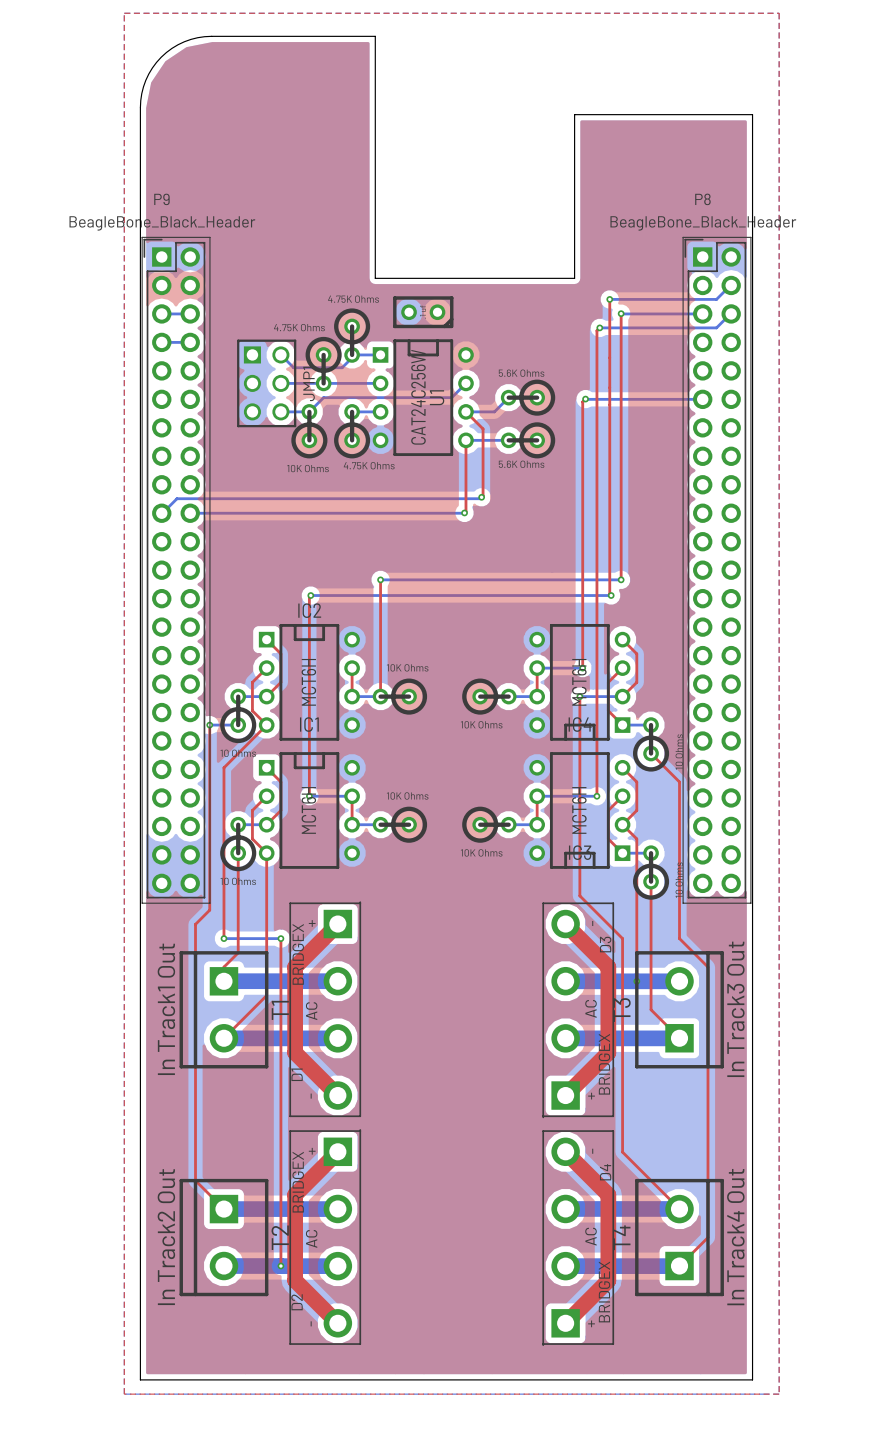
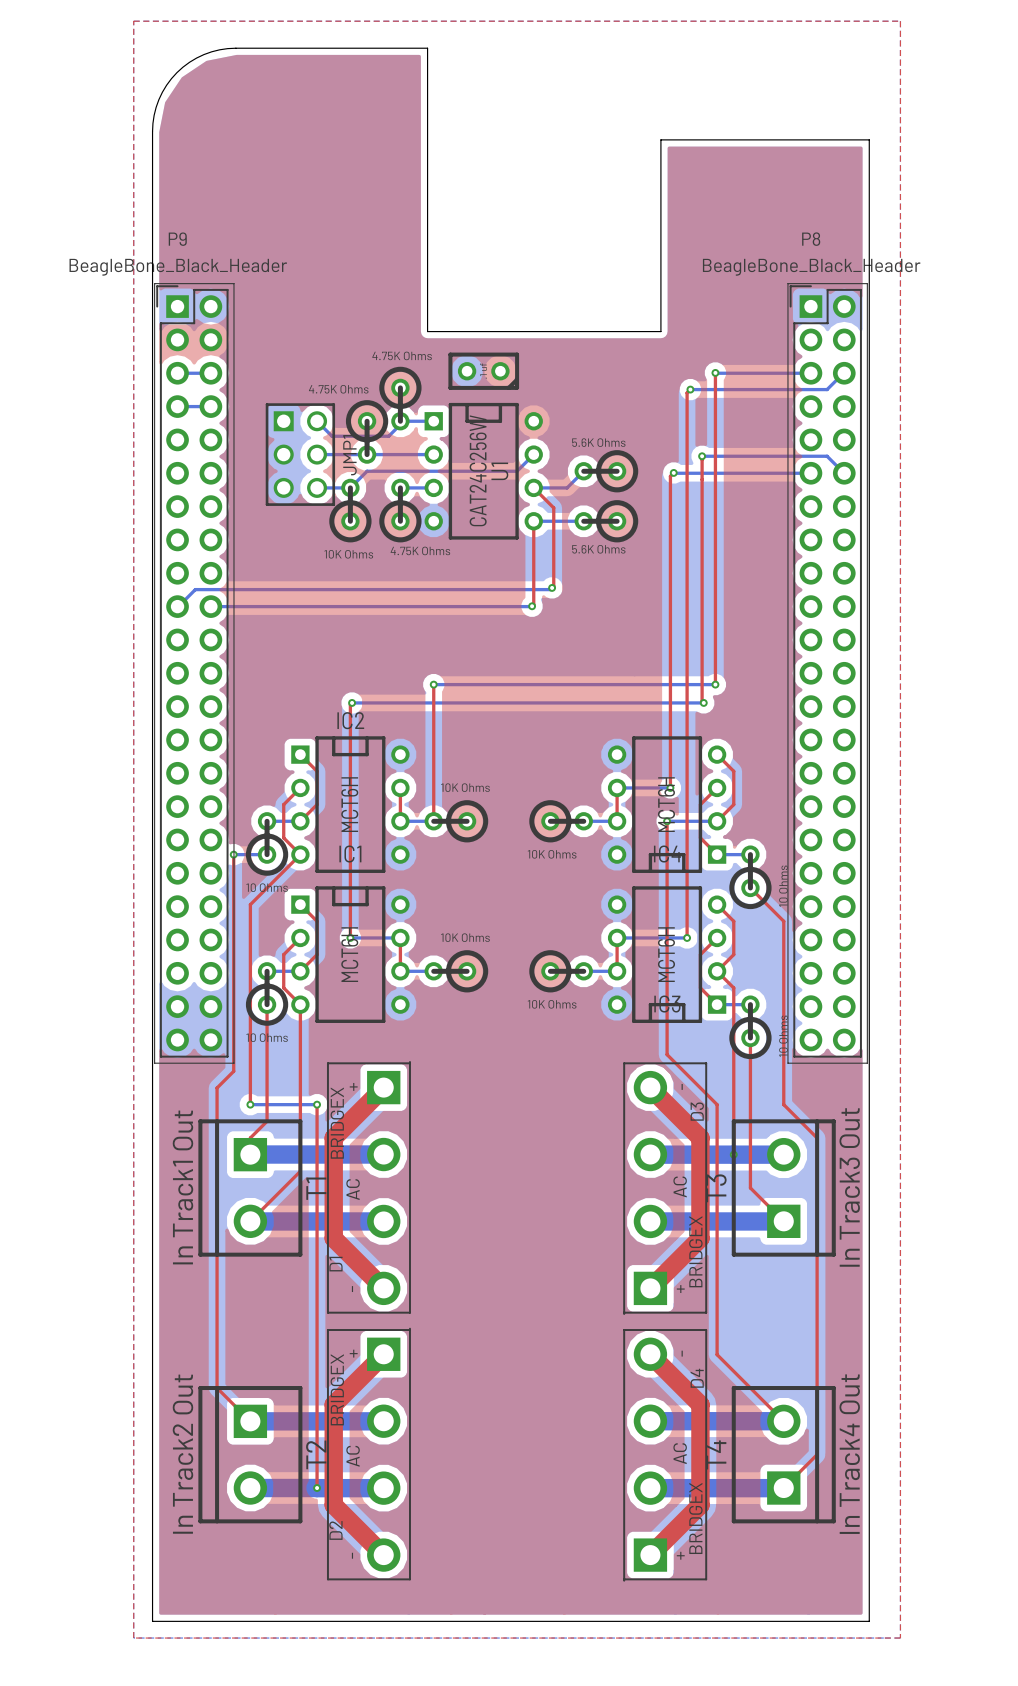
bottom track: (731, 285) (716, 299) (609, 299) -> none
top track: (609, 299) (609, 384) -> none
via: (609, 299) -> none
bottom track: none -> (702, 456) (827, 456) (844, 473)
via: none -> (702, 456)

